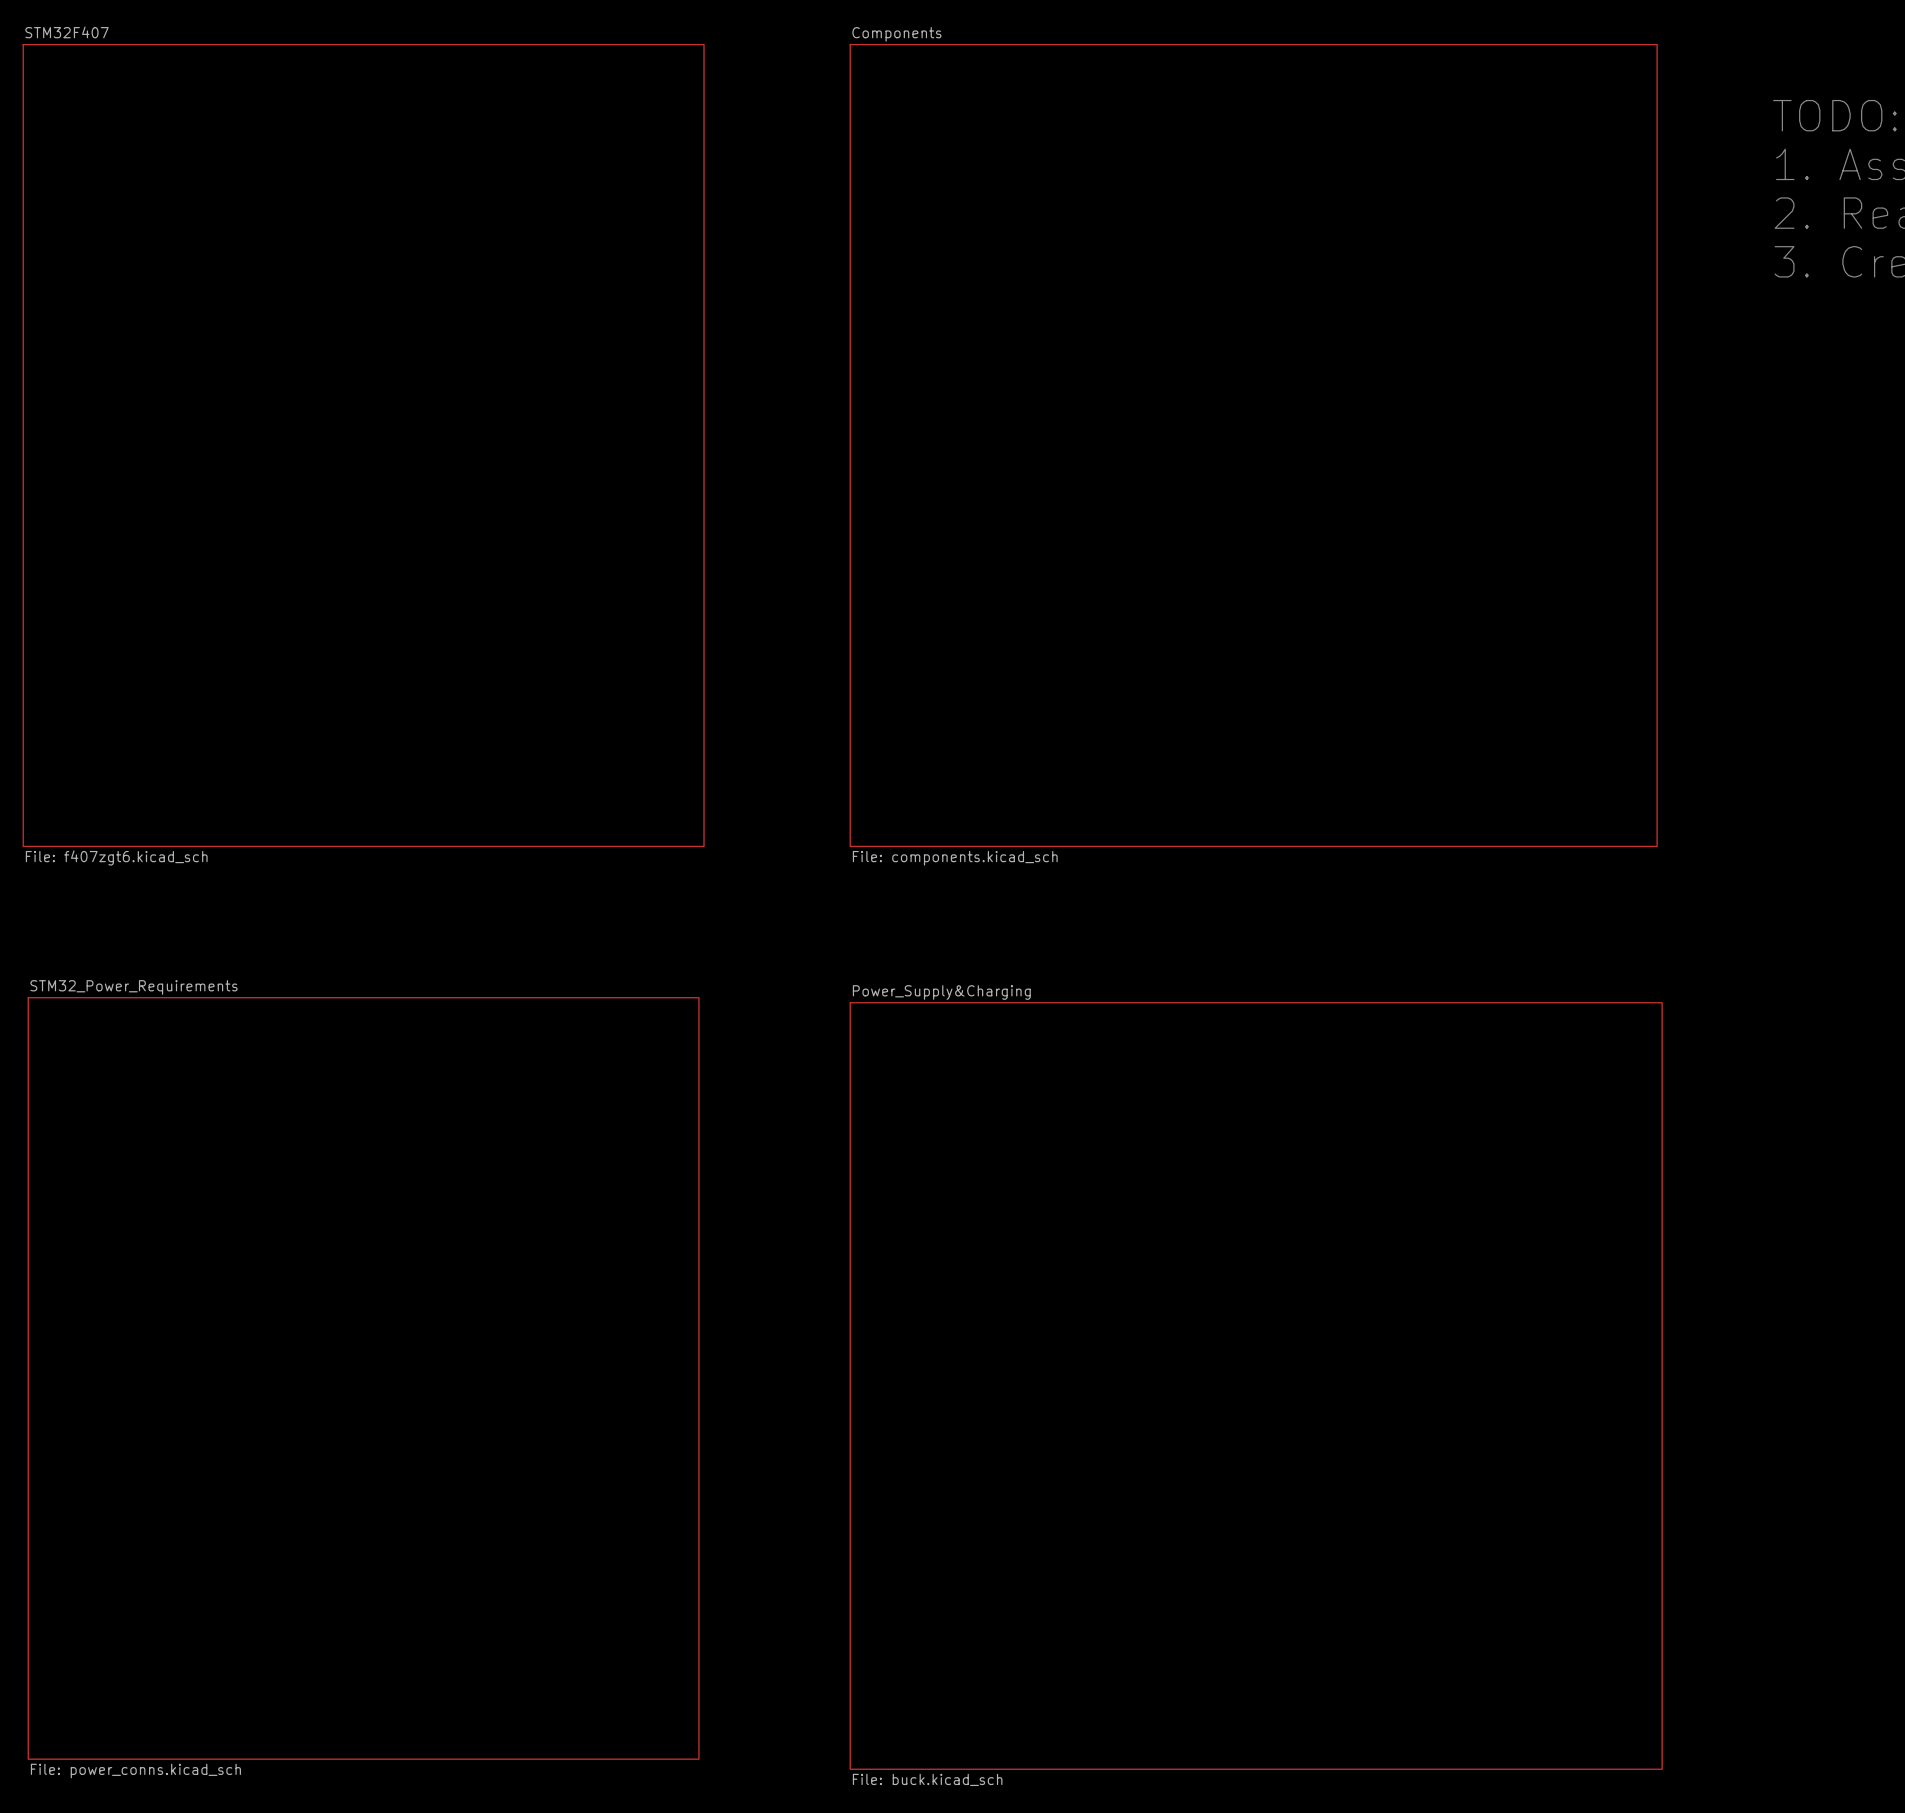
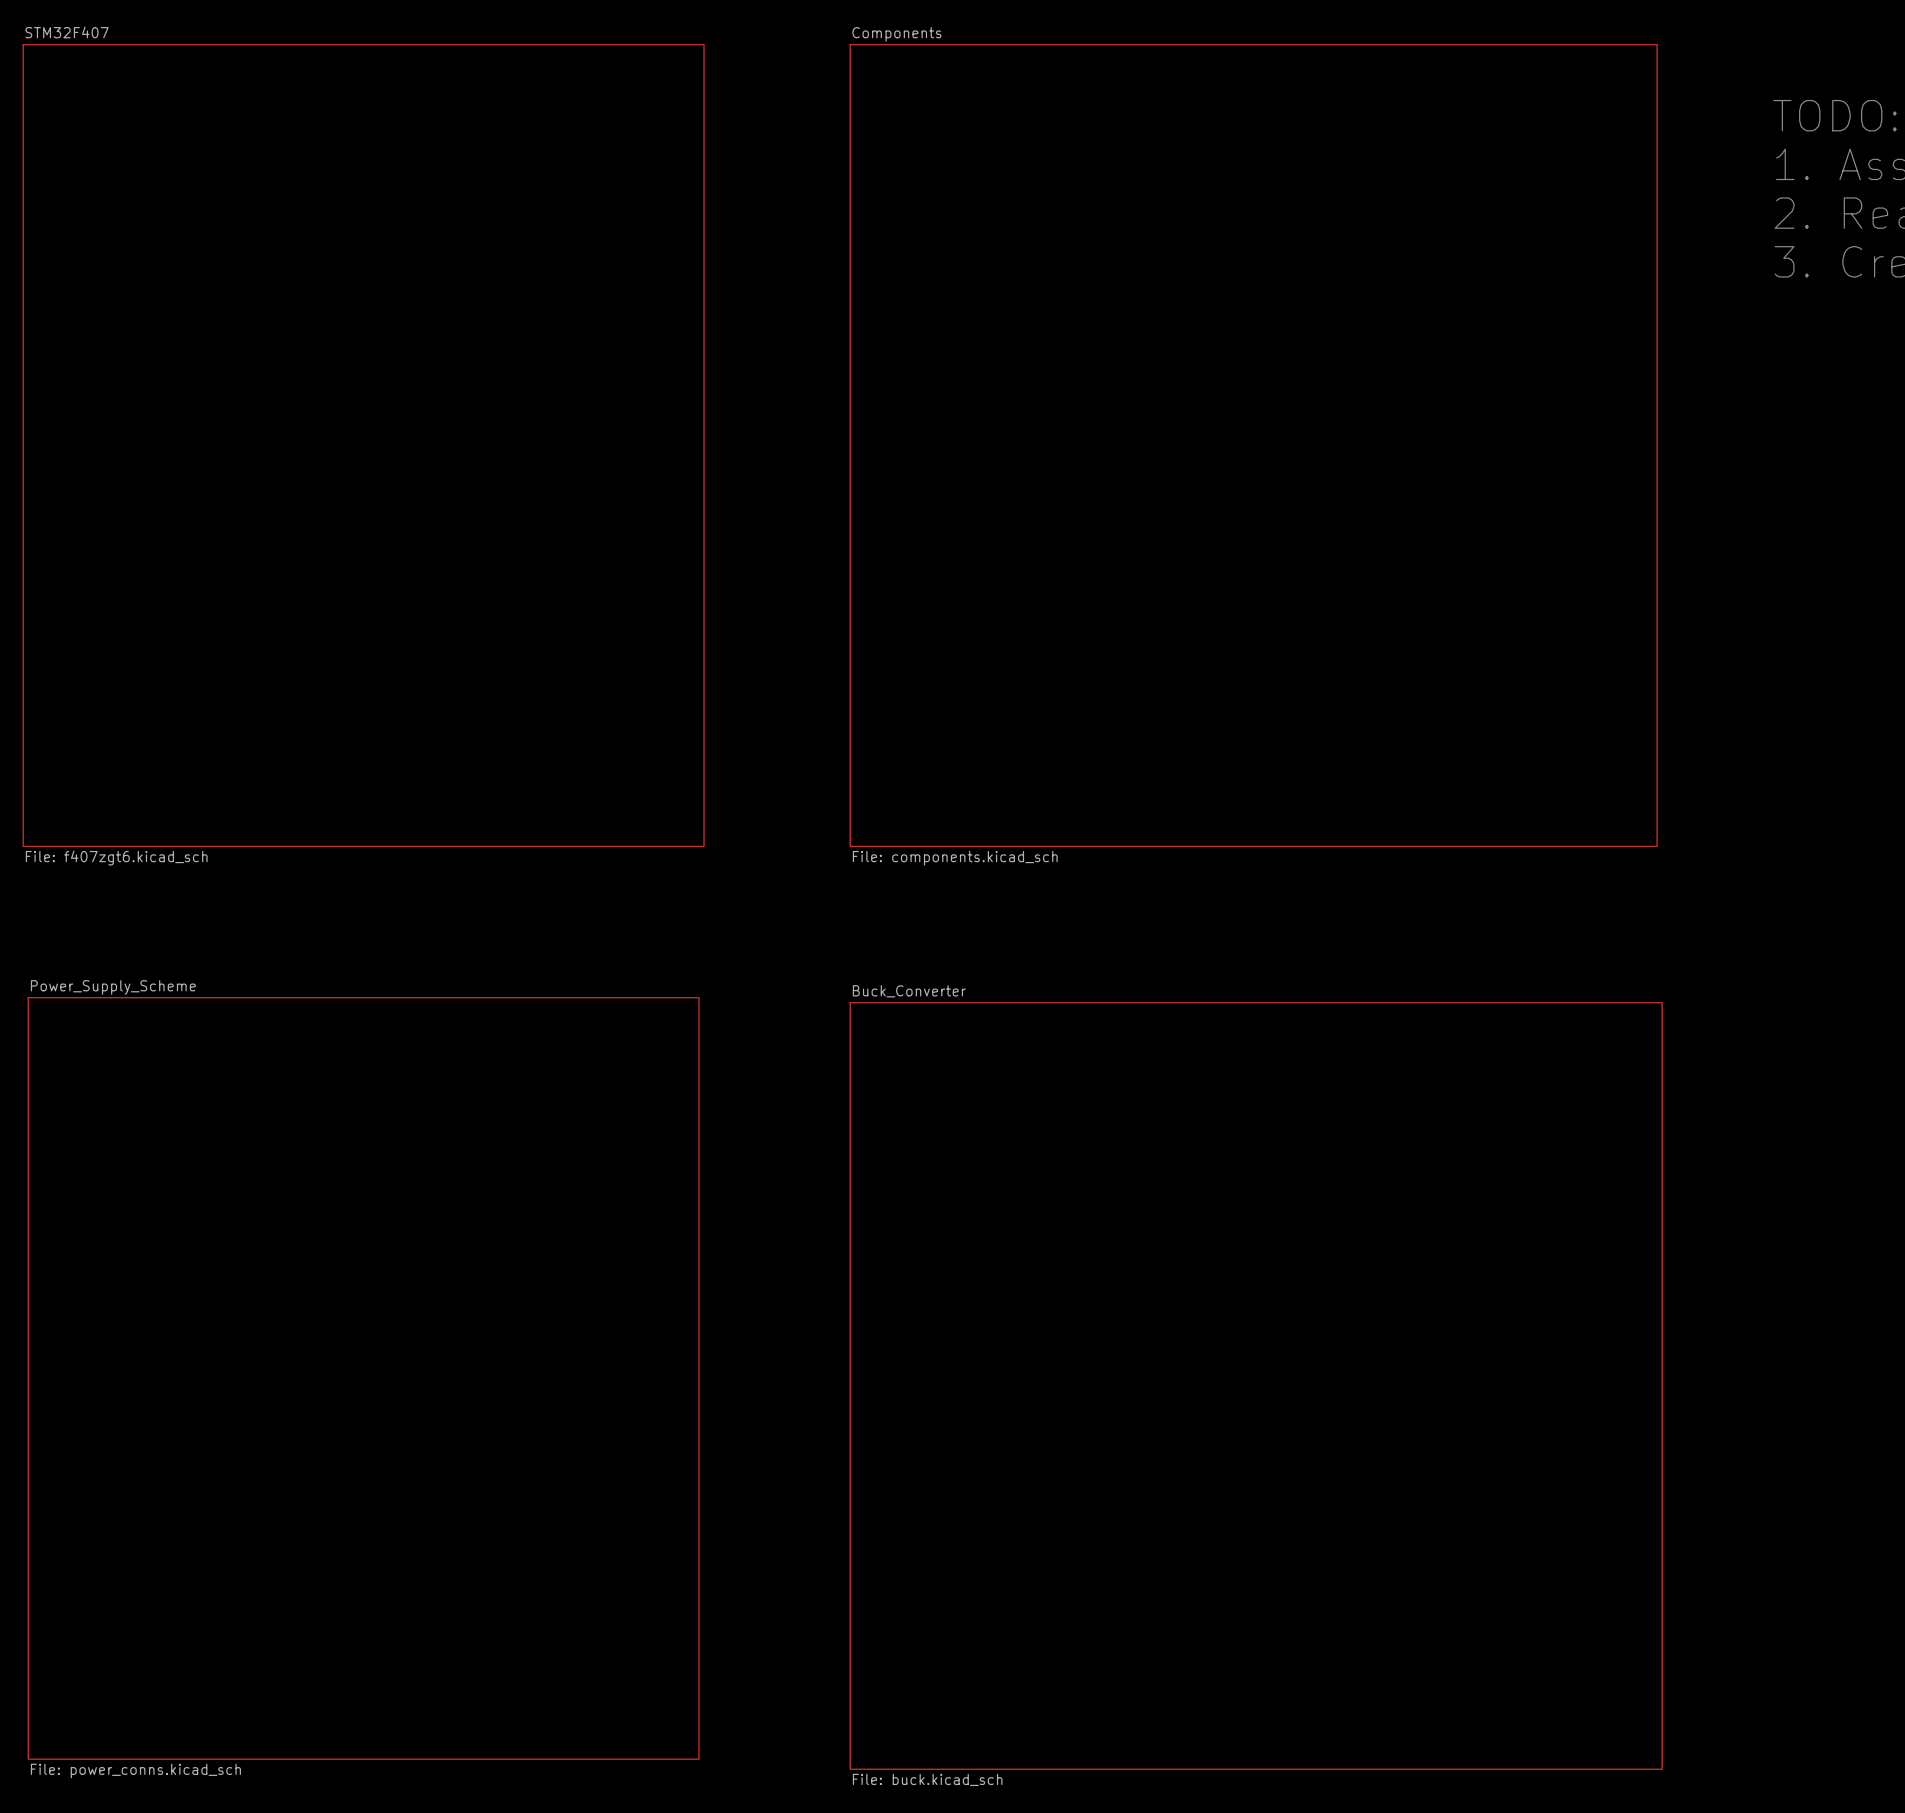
sheet STM32_Power_Requirements name: STM32_Power_Requirements (134, 987) -> Power_Supply_Scheme (113, 987)
sheet Power_Supply&Charging name: Power_Supply&Charging (941, 992) -> Buck_Converter (909, 991)

